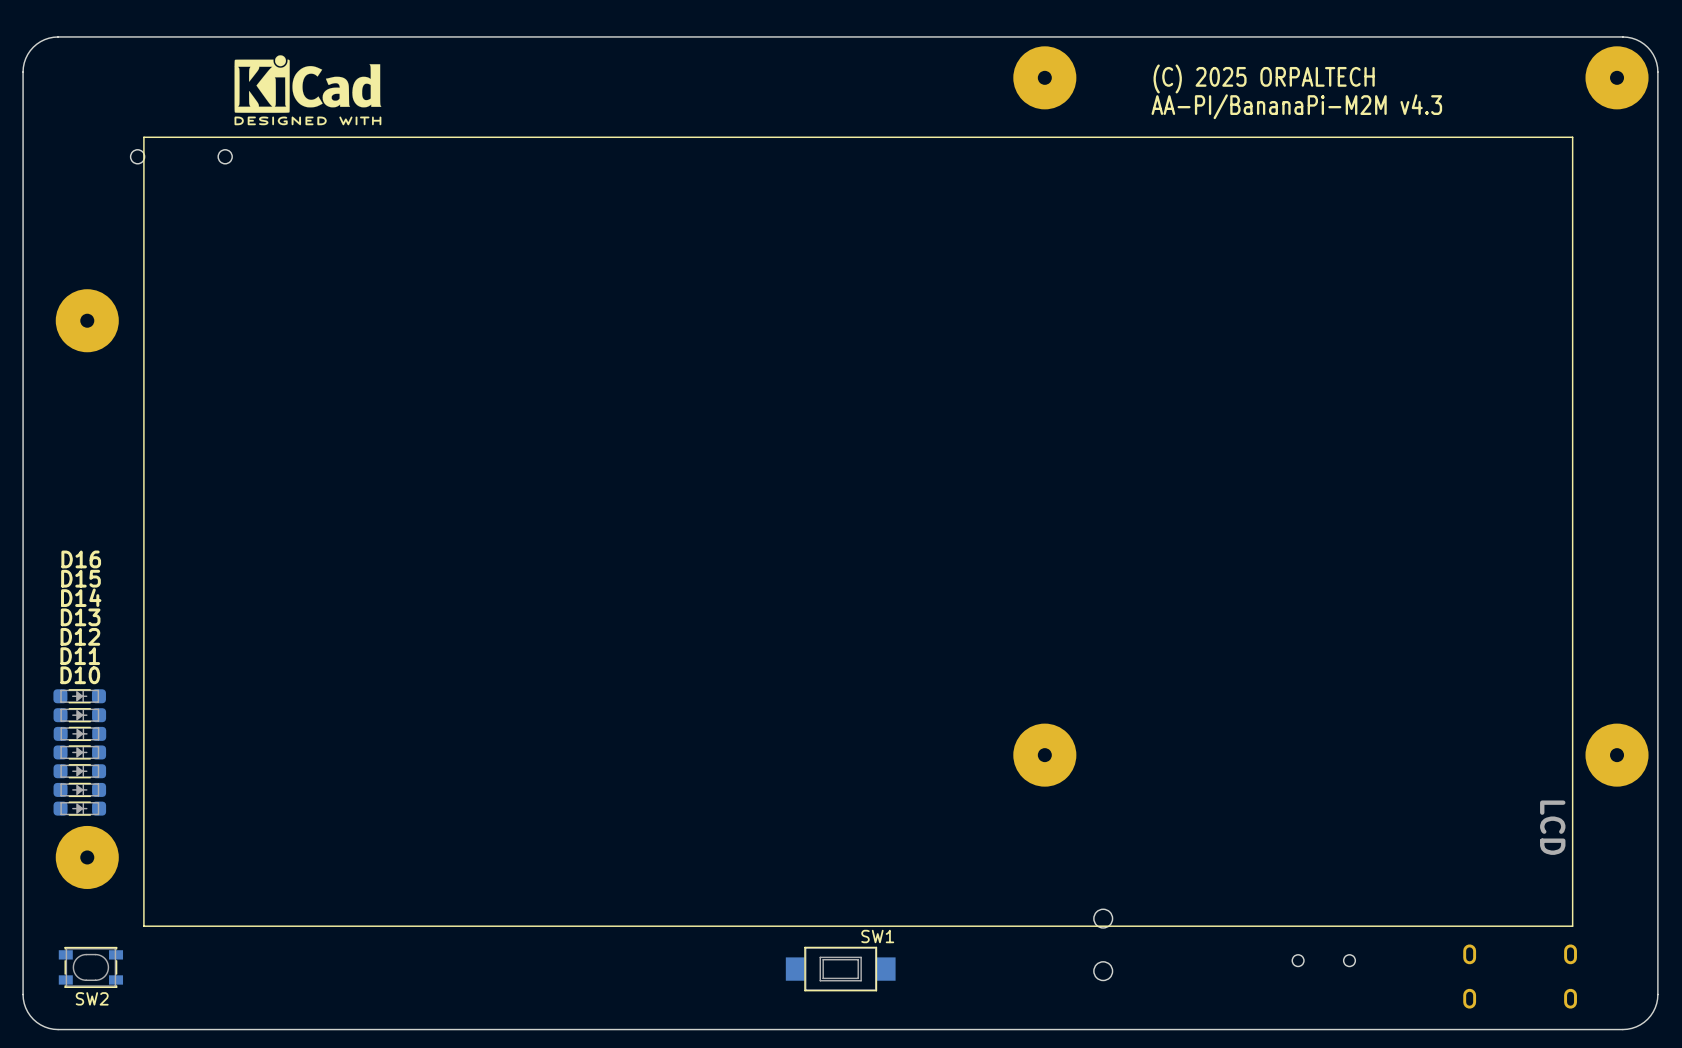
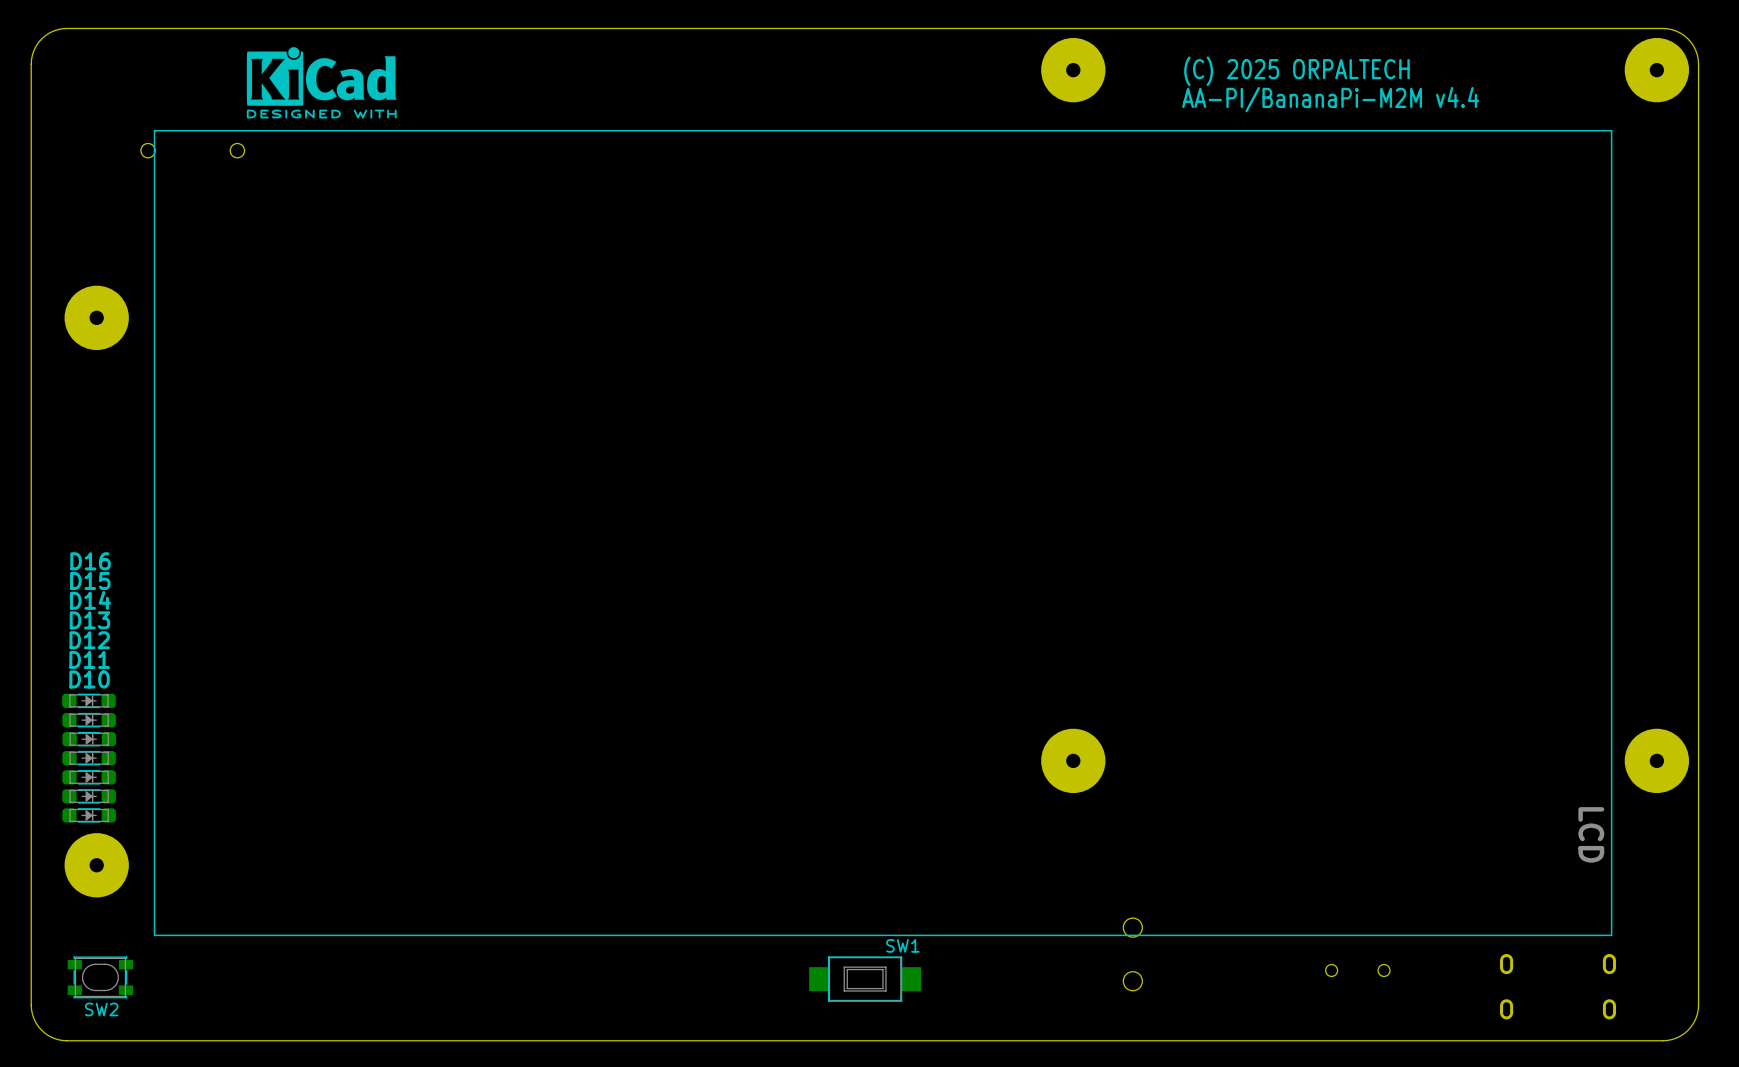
text: AA-PI/BananaPi-M2M v4.3 (1296, 106) -> AA-PI/BananaPi-M2M v4.4 (1330, 99)

